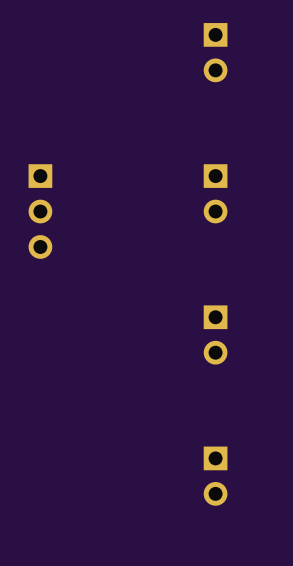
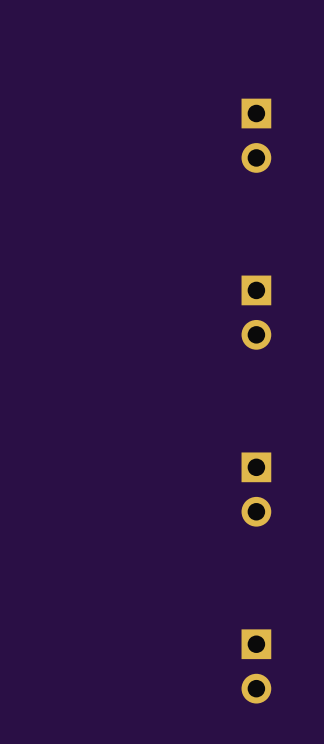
part: (40, 211) -> none

